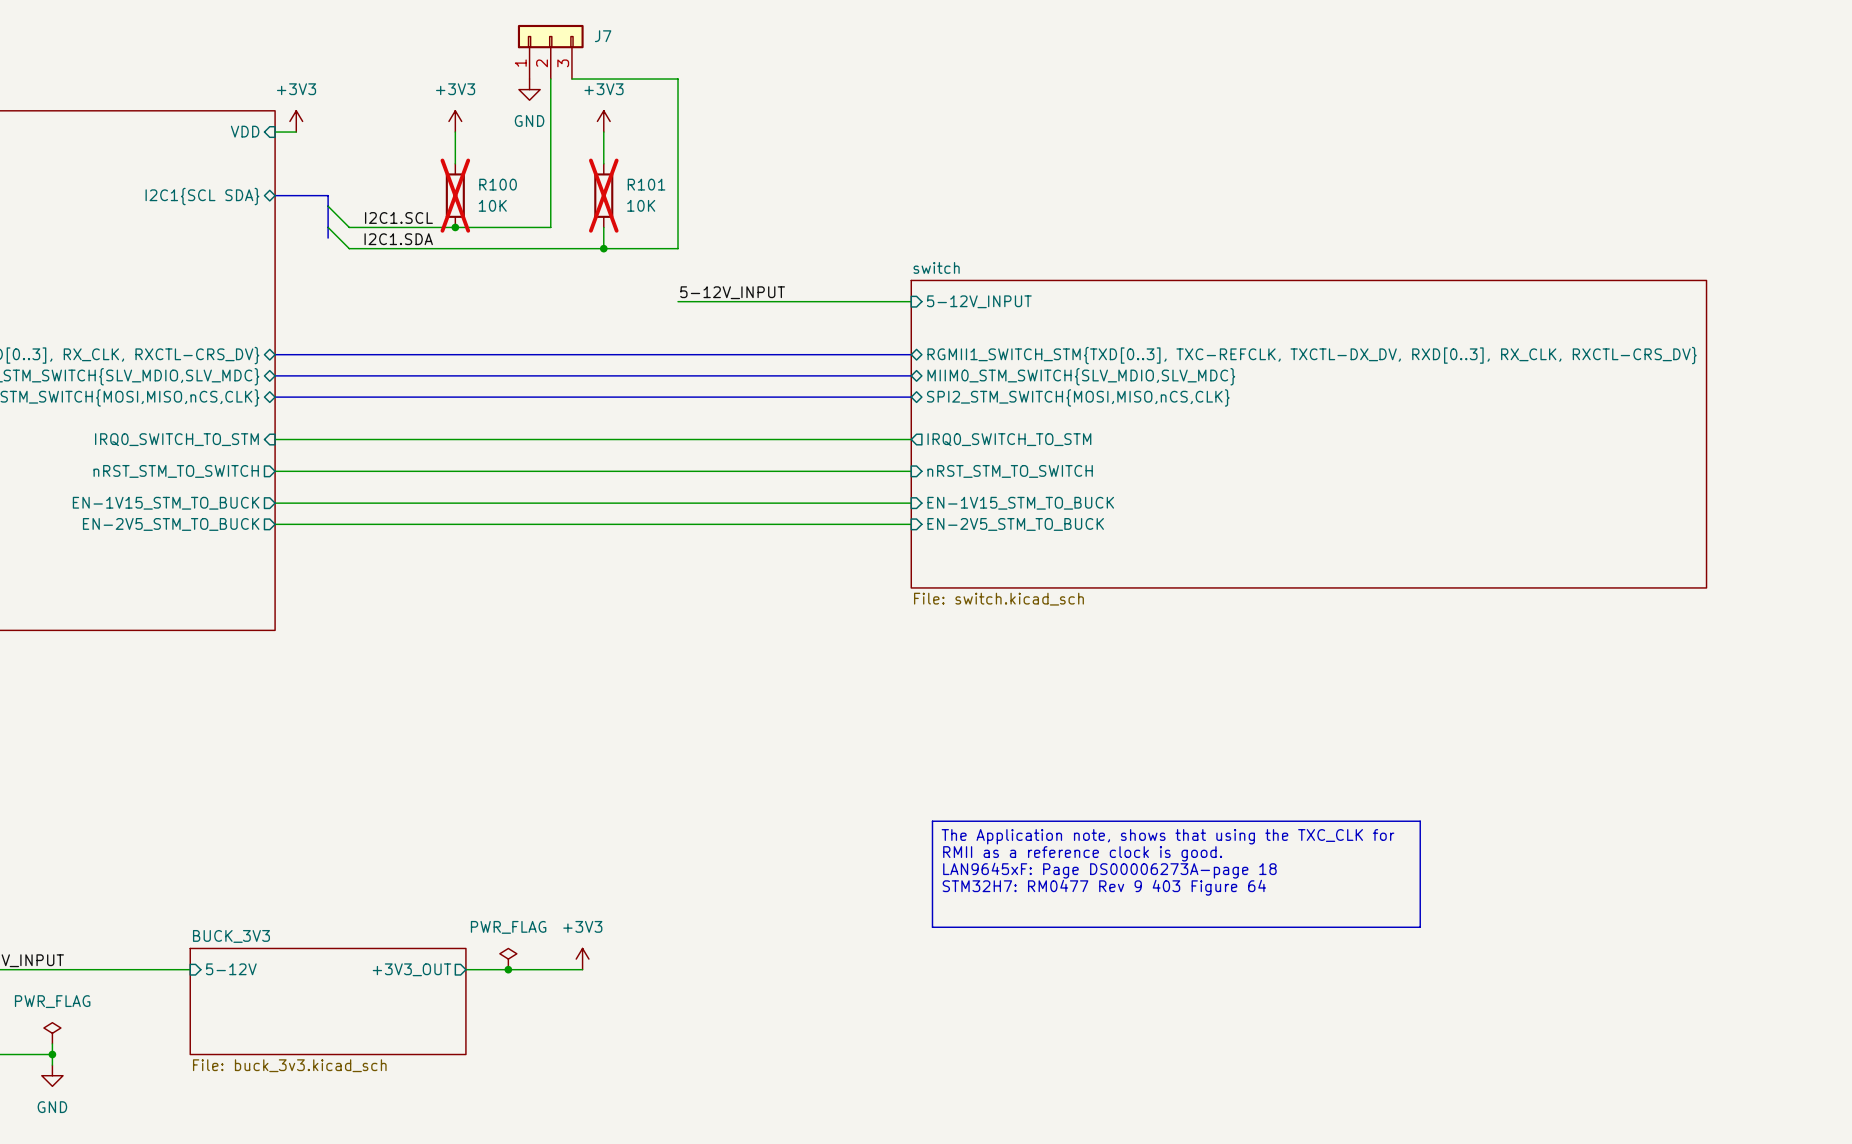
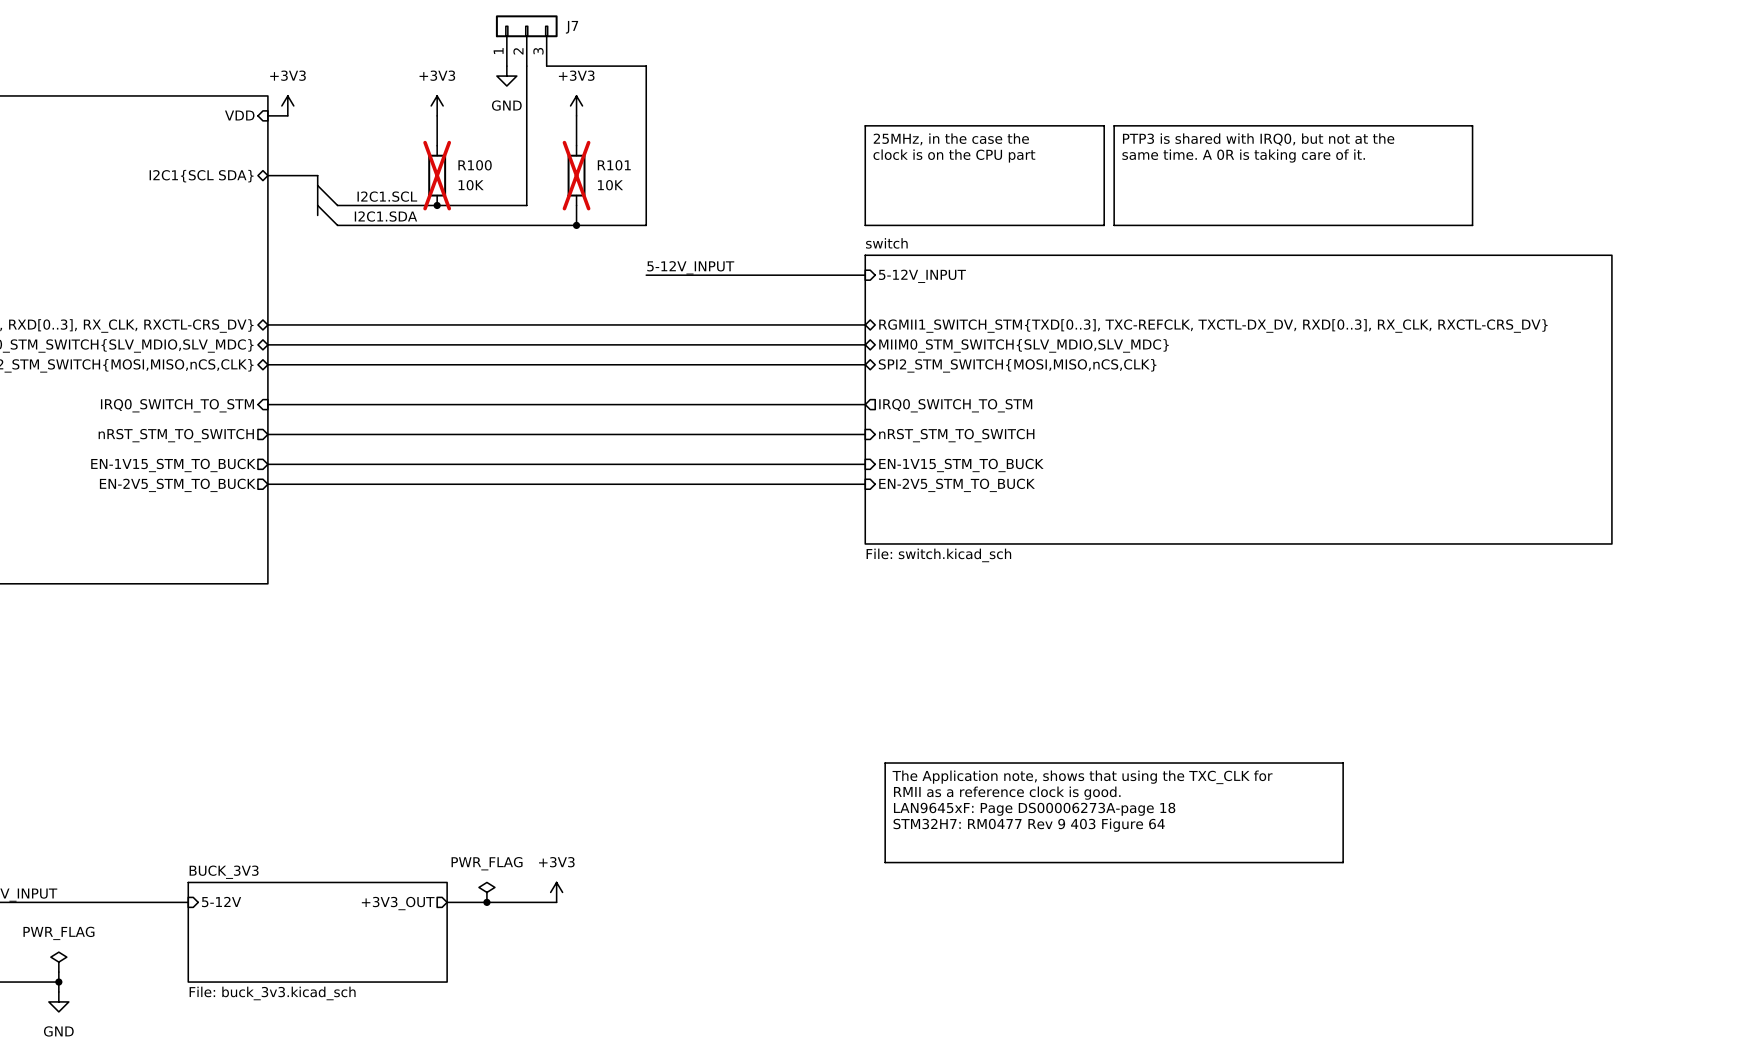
line: none -> (865, 125) (1104, 125) (1104, 225) (865, 225) (865, 125)
line: none -> (1114, 125) (1472, 125) (1472, 225) (1114, 225) (1114, 125)
text: none -> 25MHz, in the case the (951, 139)
text: none -> PTP3 is shared with IRQ0, but not at the (1258, 139)
text: none -> clock is on the CPU part (954, 156)
text: none -> same time. A 0R is taking care of it. (1243, 156)

